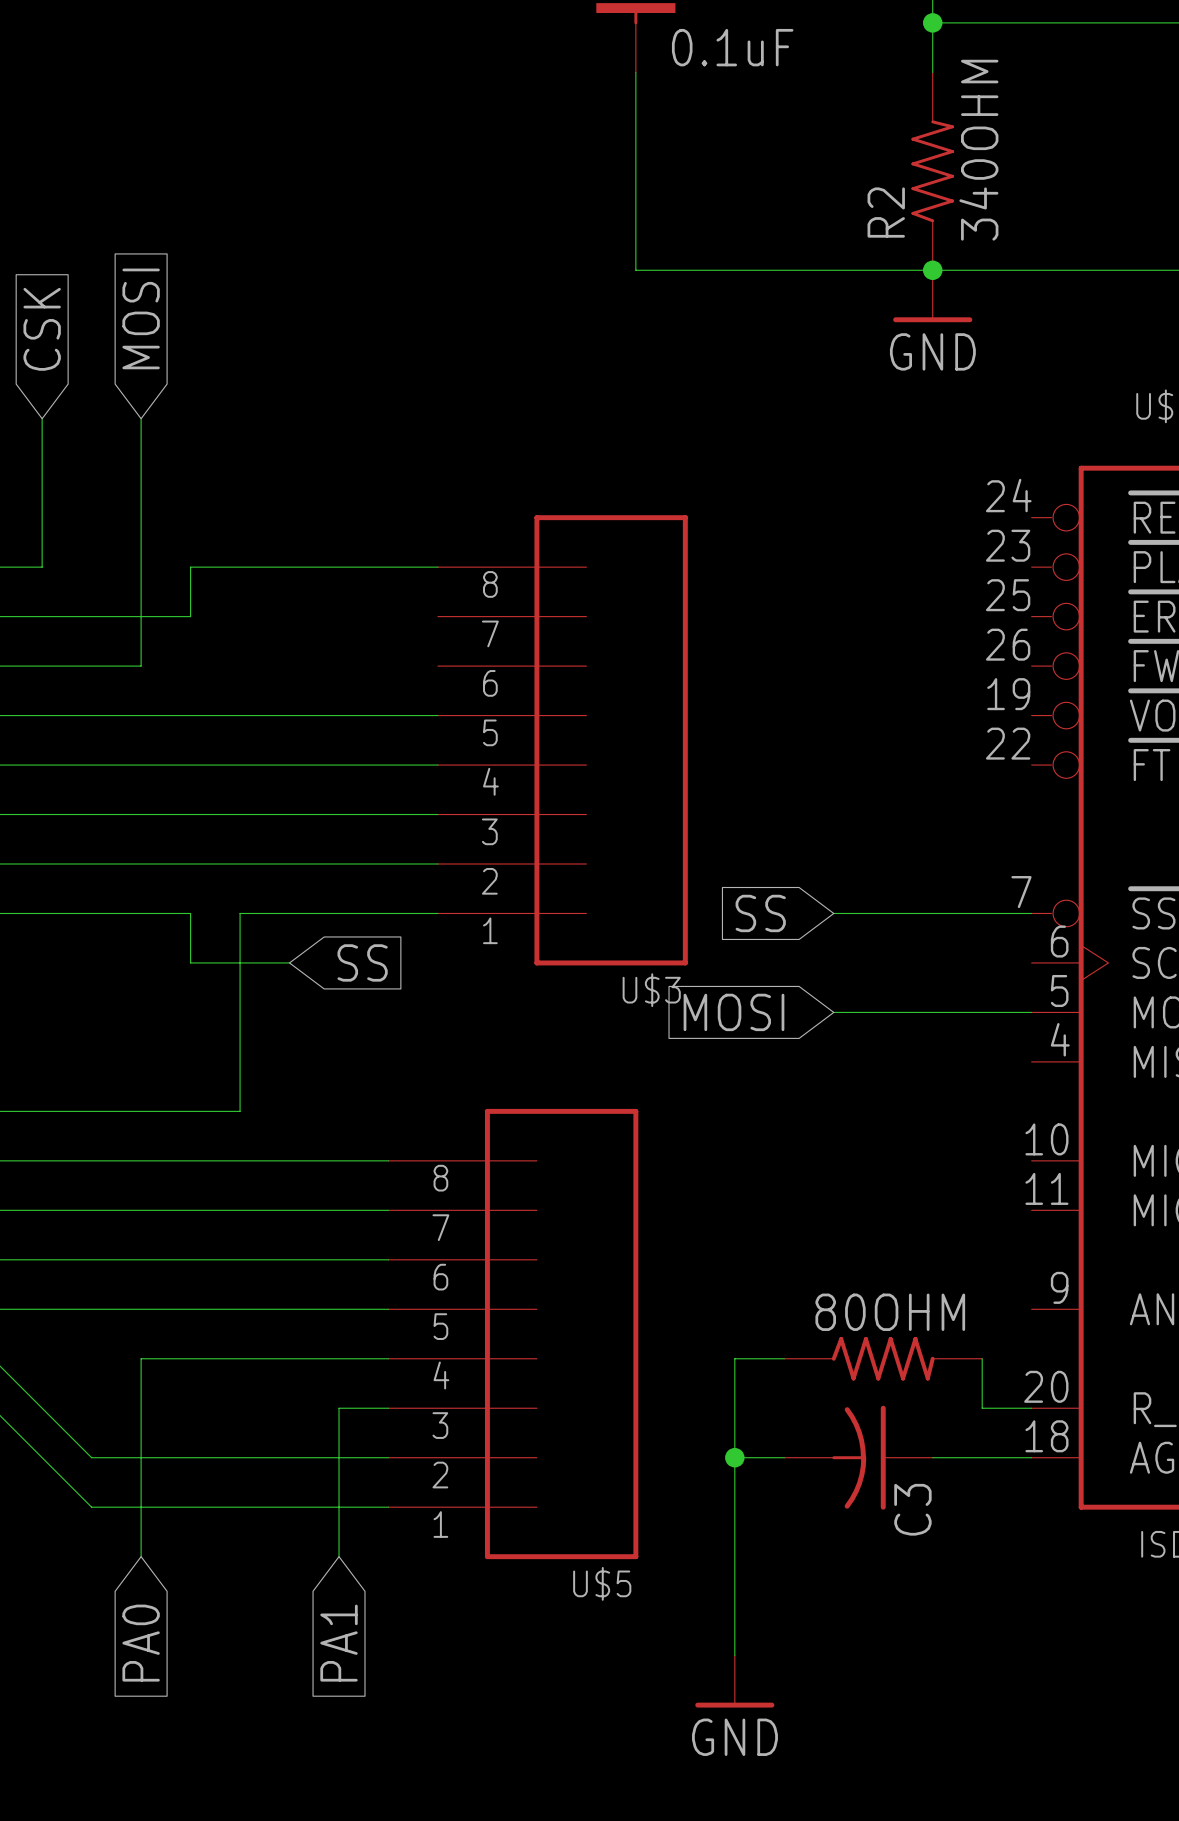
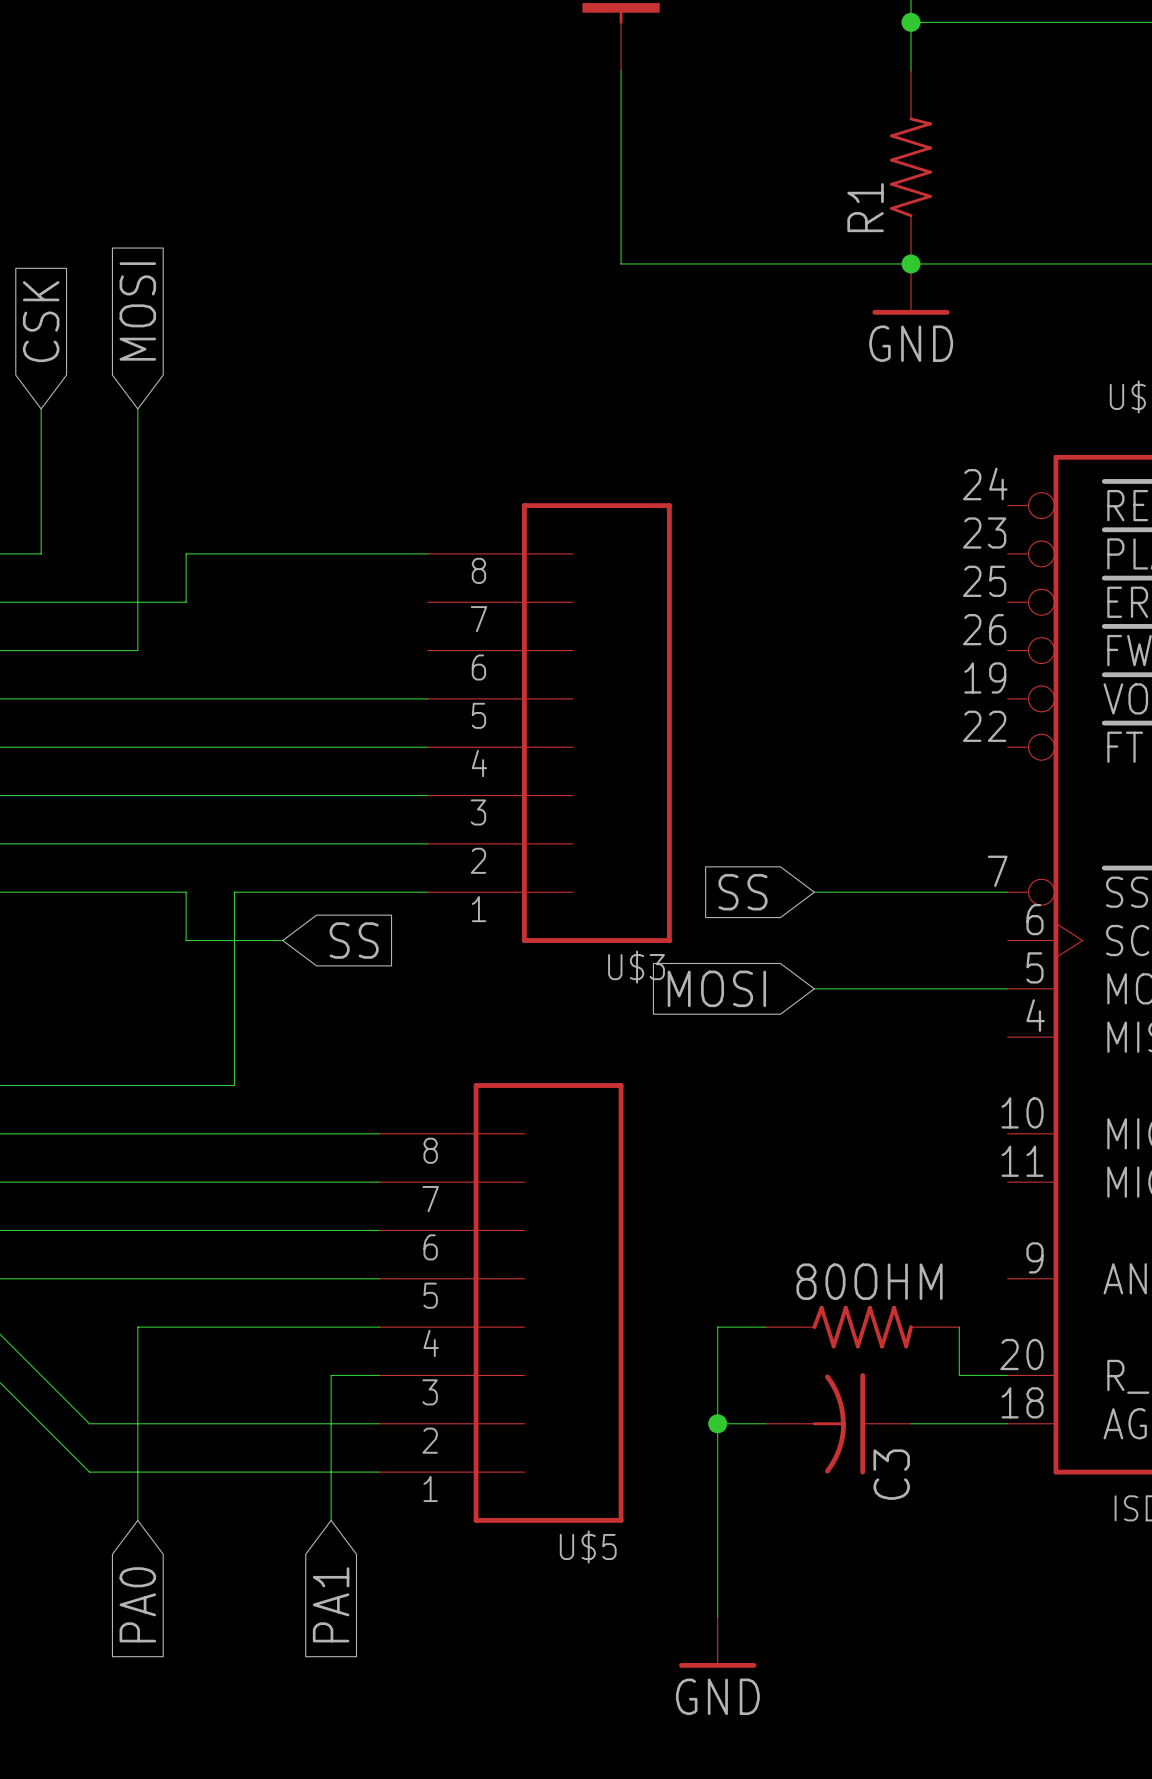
part value: 0.1uF (732, 47) -> none
R2 value: 340OHM (978, 150) -> none
R2 name: R2 (886, 212) -> R1 (865, 207)

